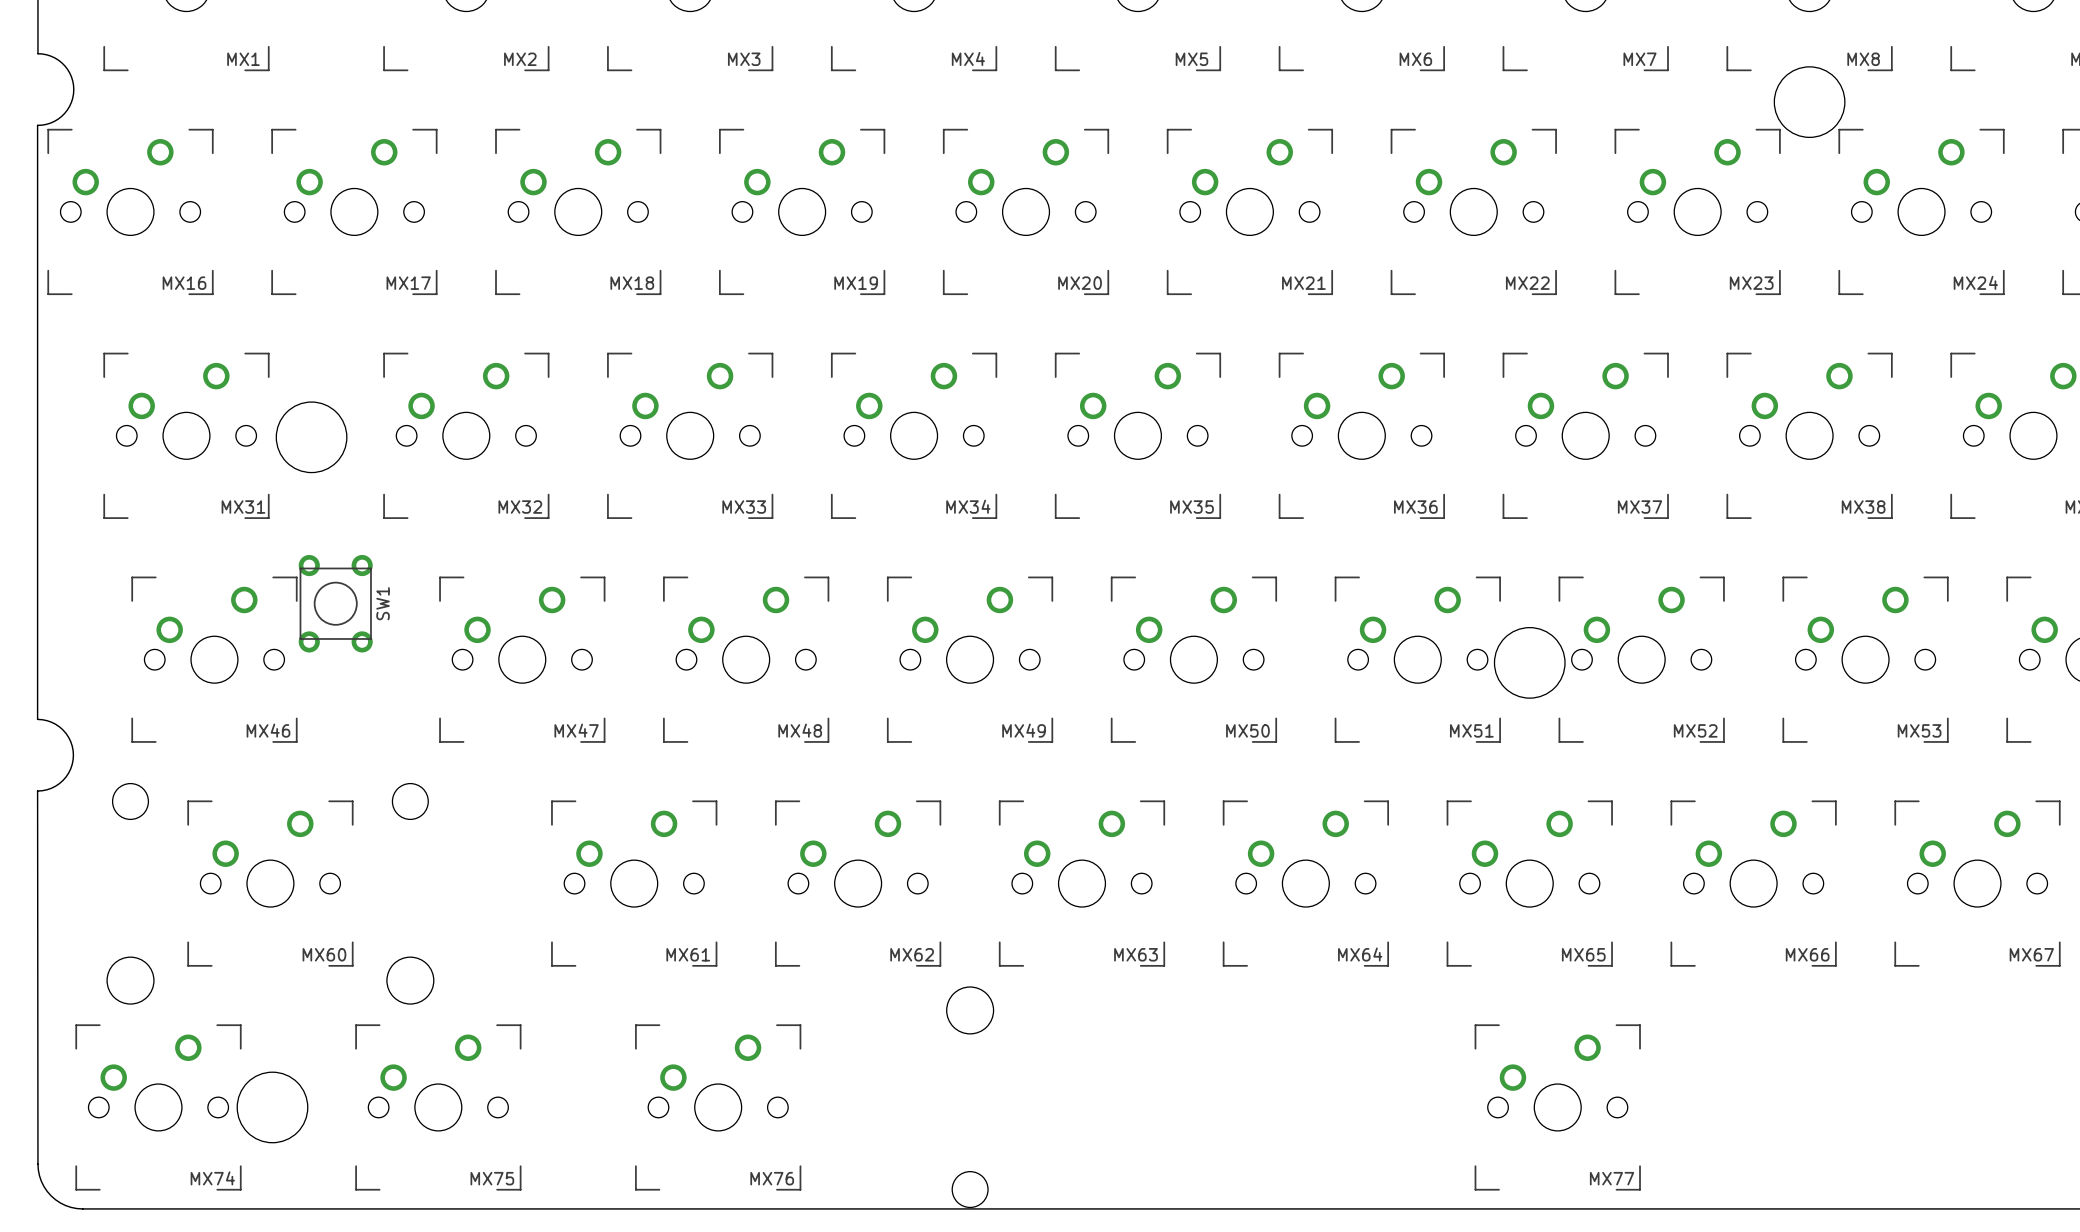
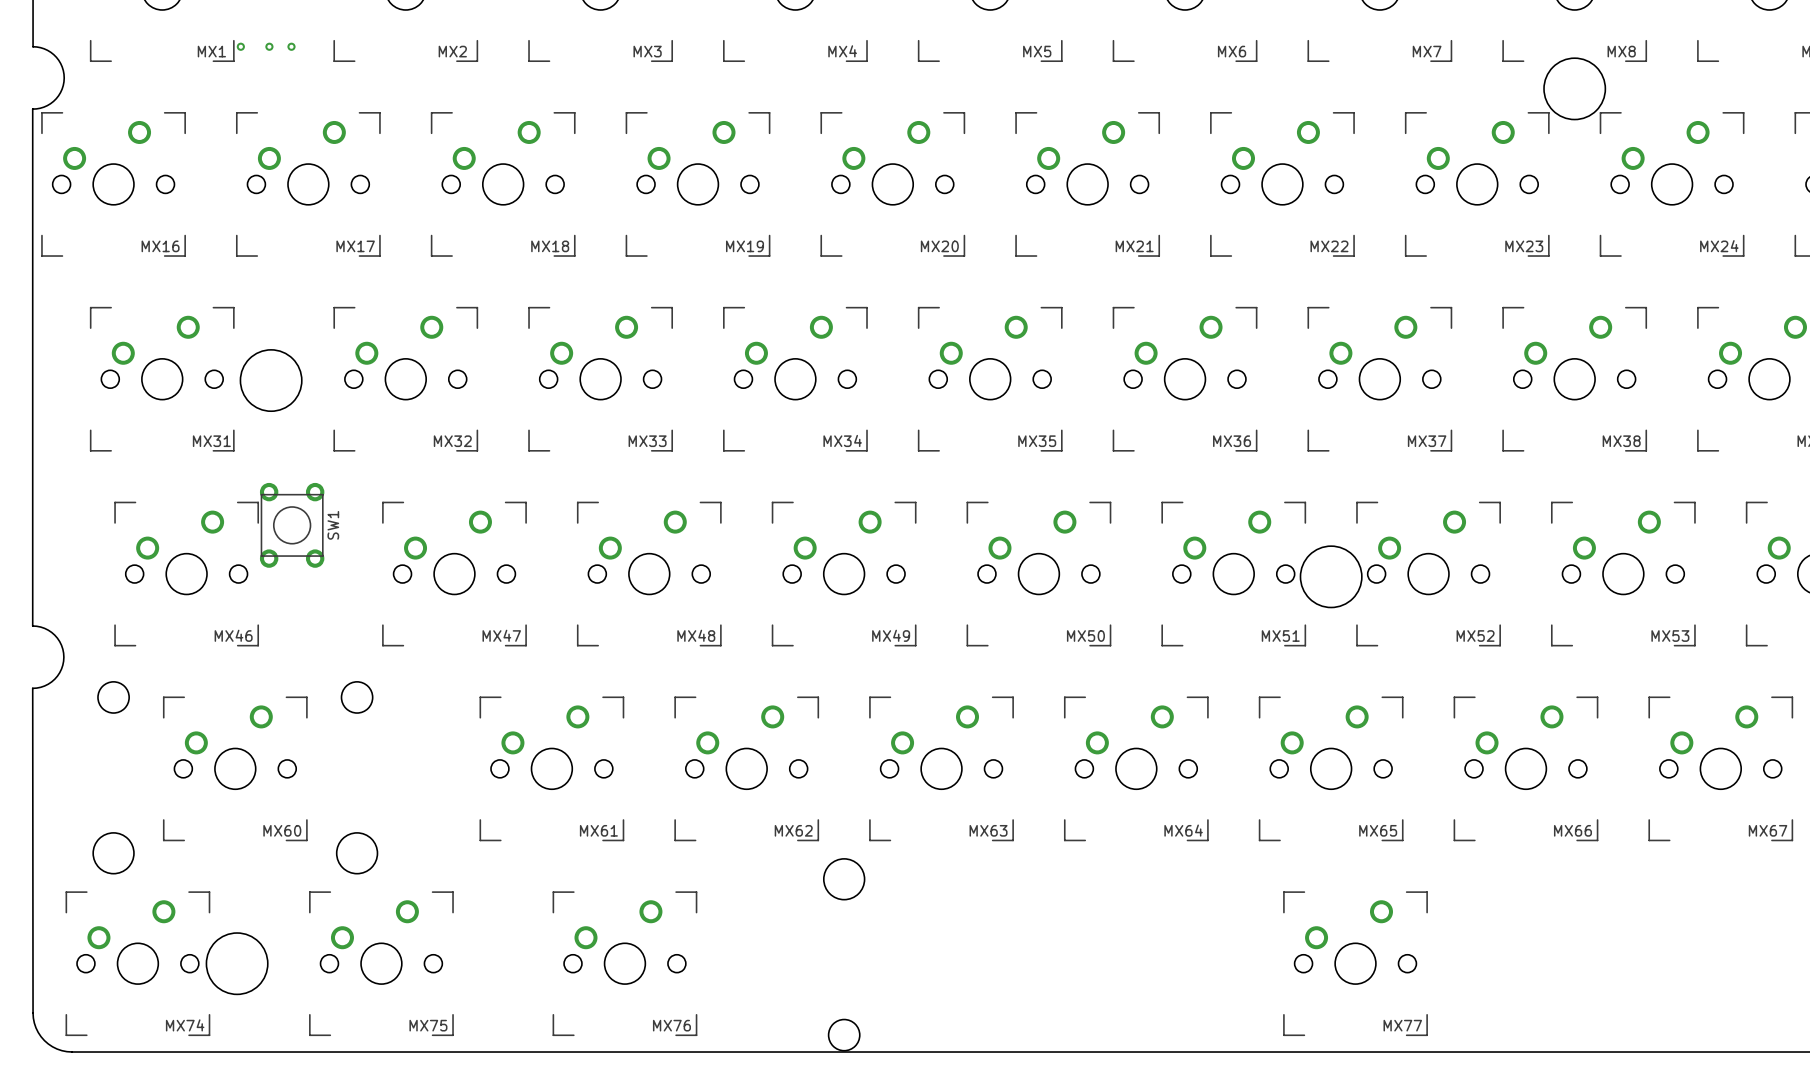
via: none -> (240, 46)
via: none -> (269, 46)
via: none -> (291, 46)

